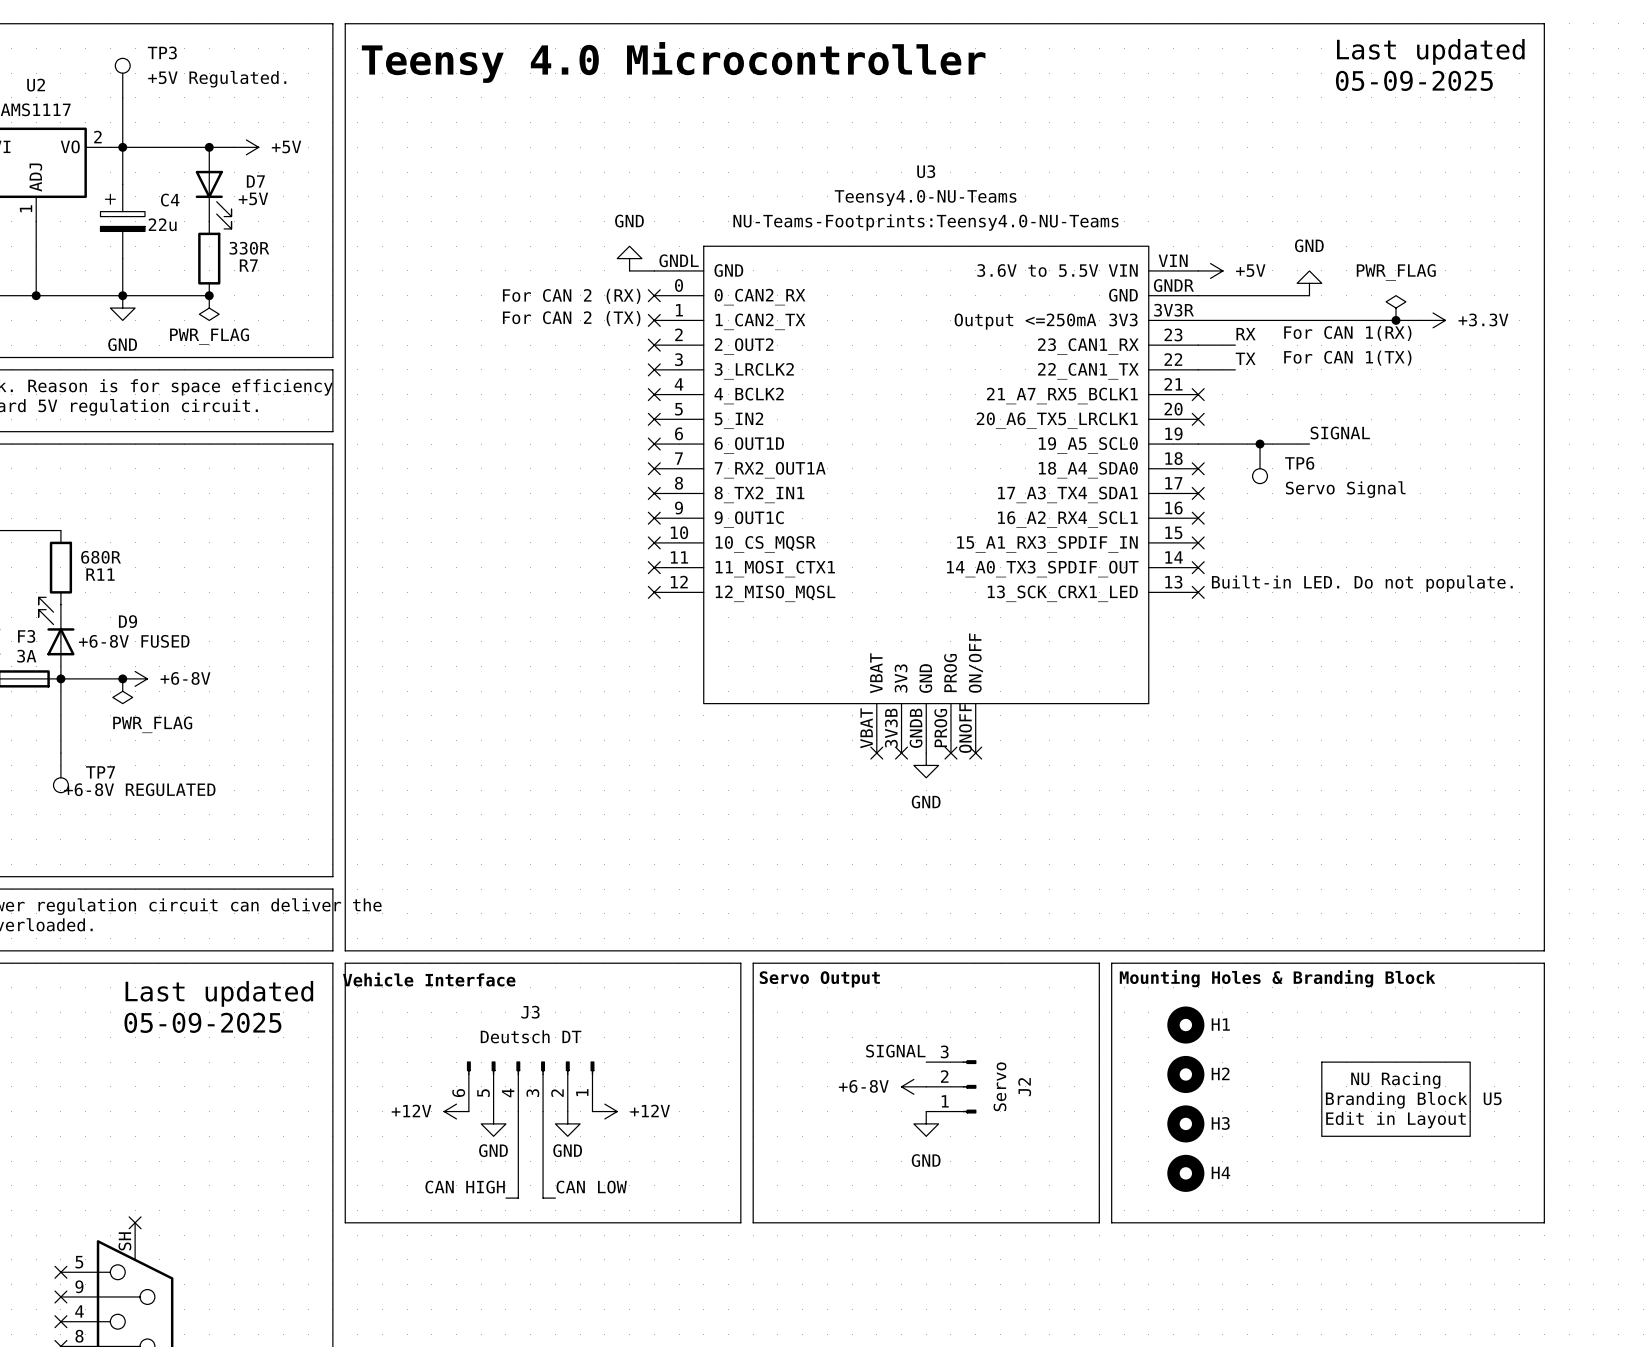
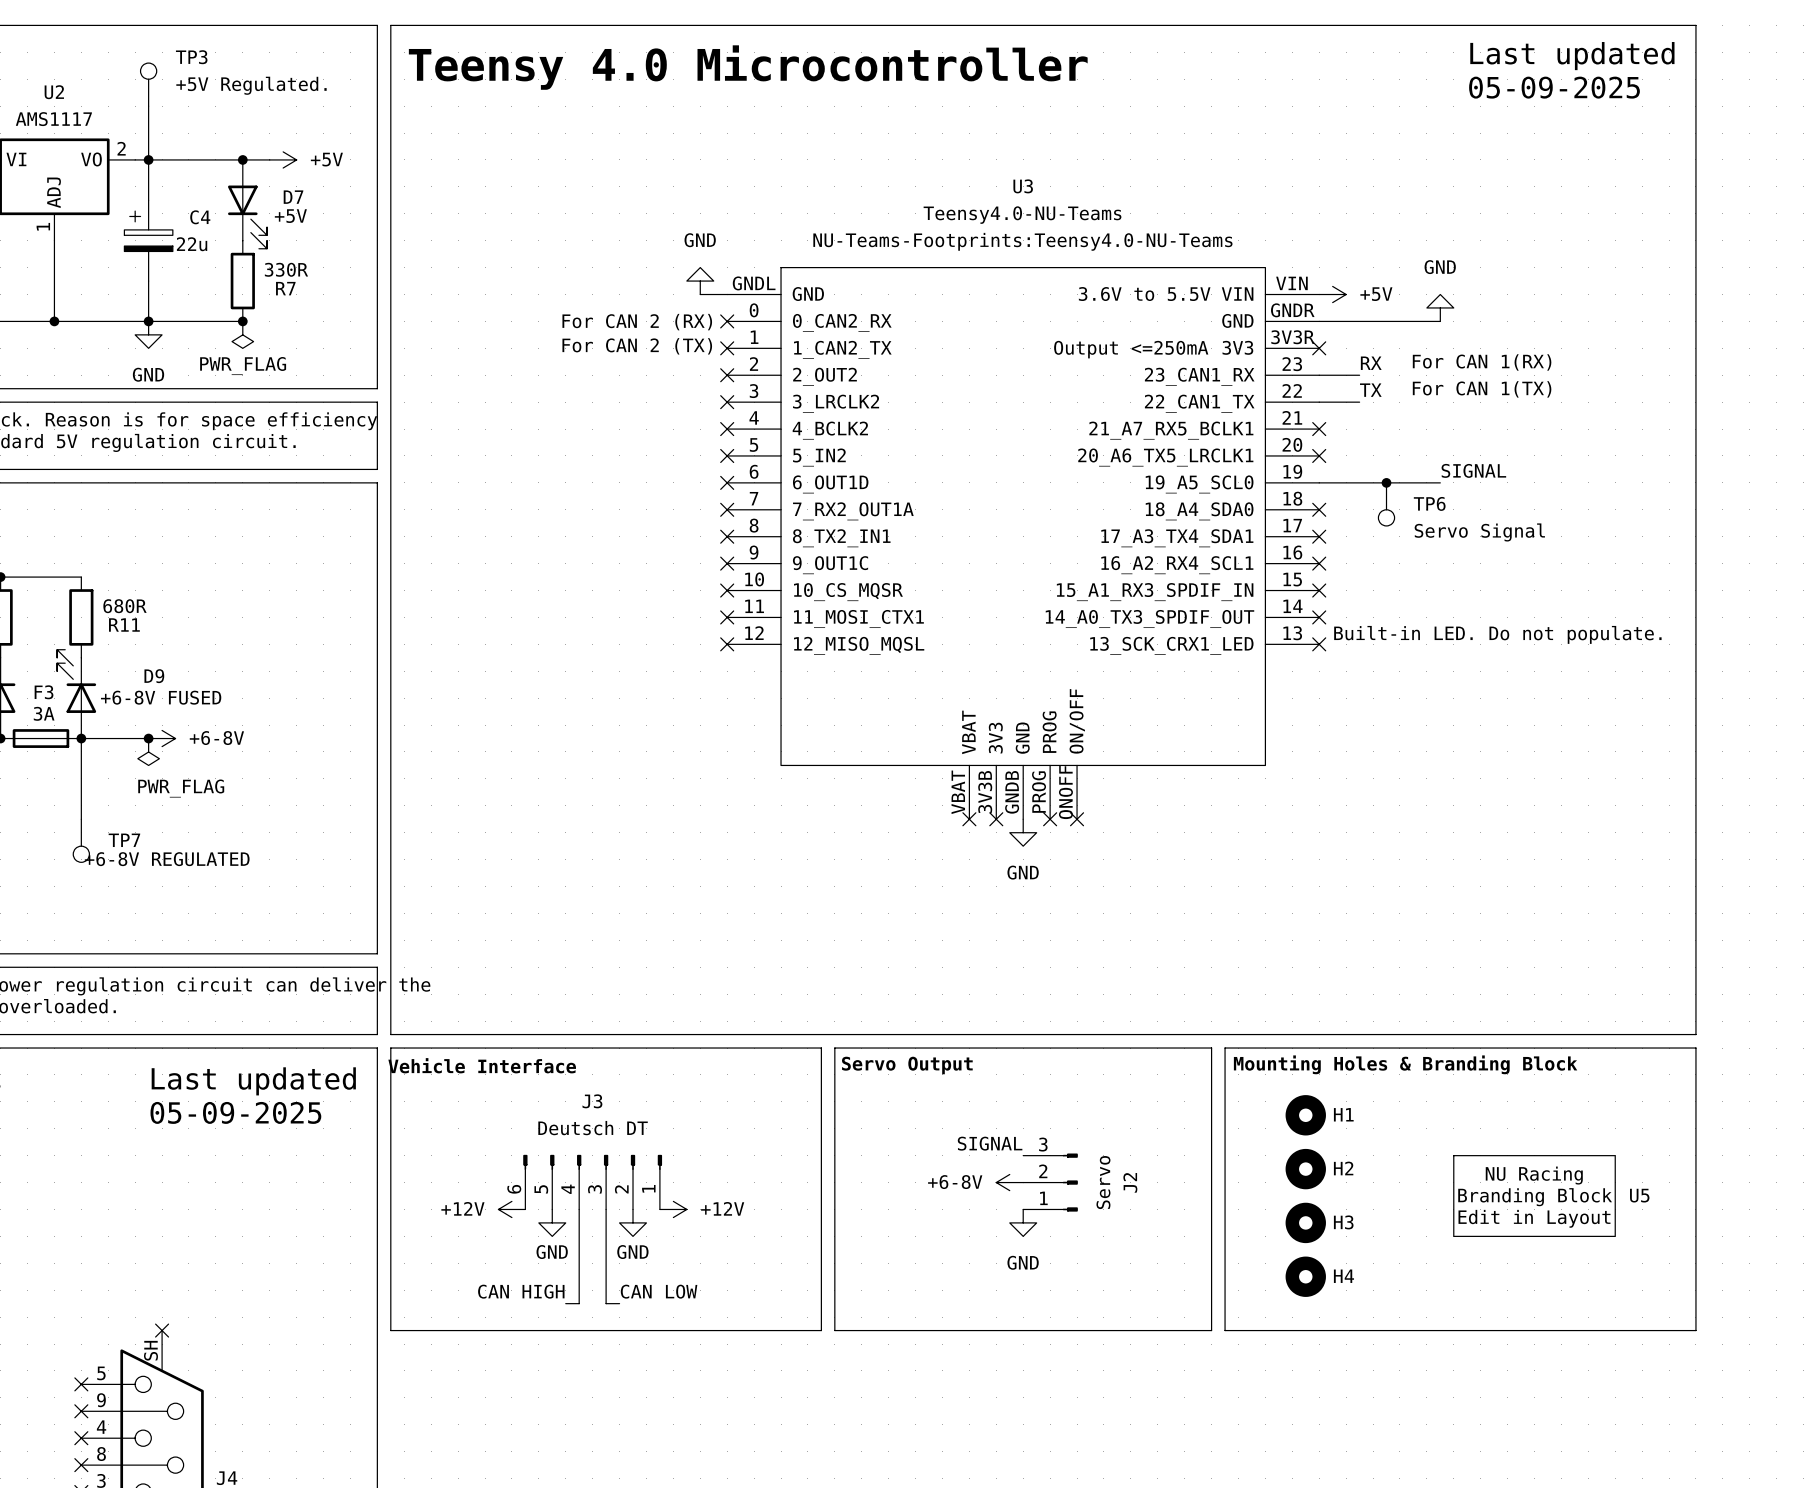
power symbol: PWR_FLAG (1395, 308) -> none
wire: (1198, 320) (1420, 320) -> none
no-connect mark: none -> (1319, 348)
junction: (1395, 320) -> none
power symbol: +3.3V (1433, 320) -> none

